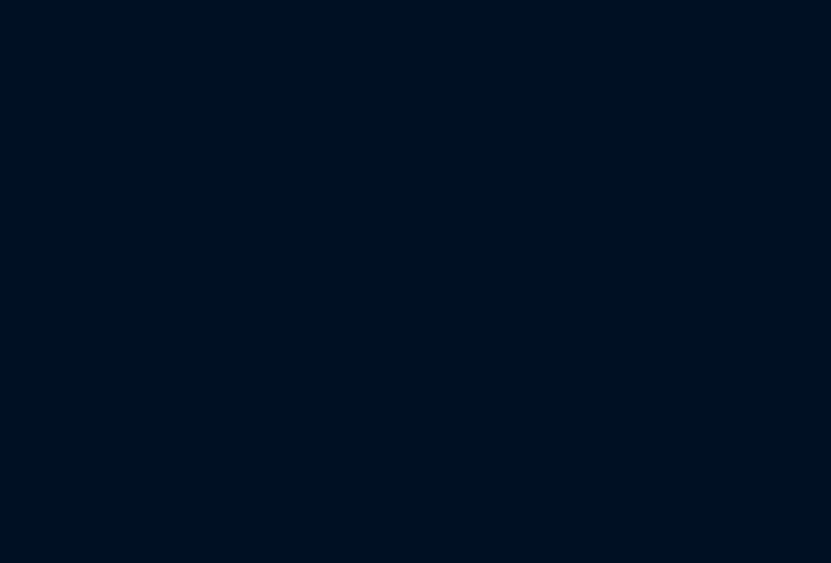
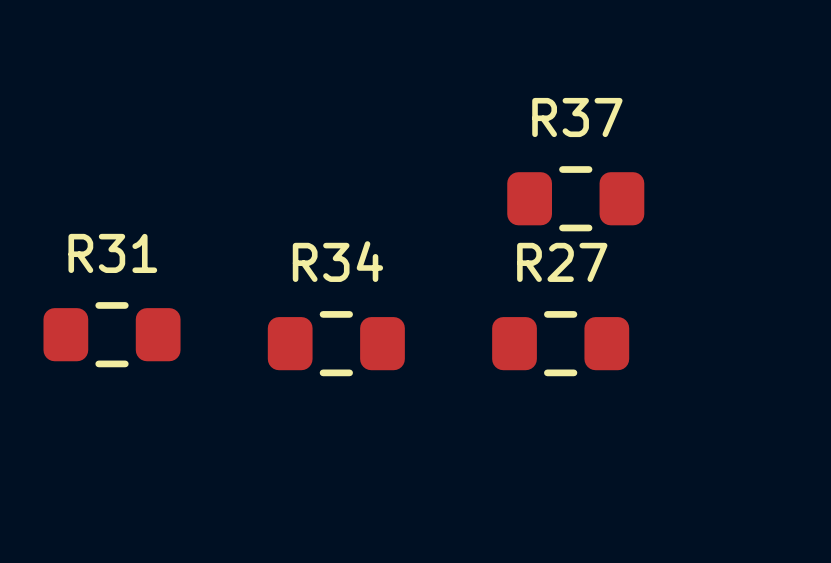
R37: none -> (575, 198)
R31: none -> (112, 334)
R34: none -> (336, 343)
R27: none -> (560, 343)

